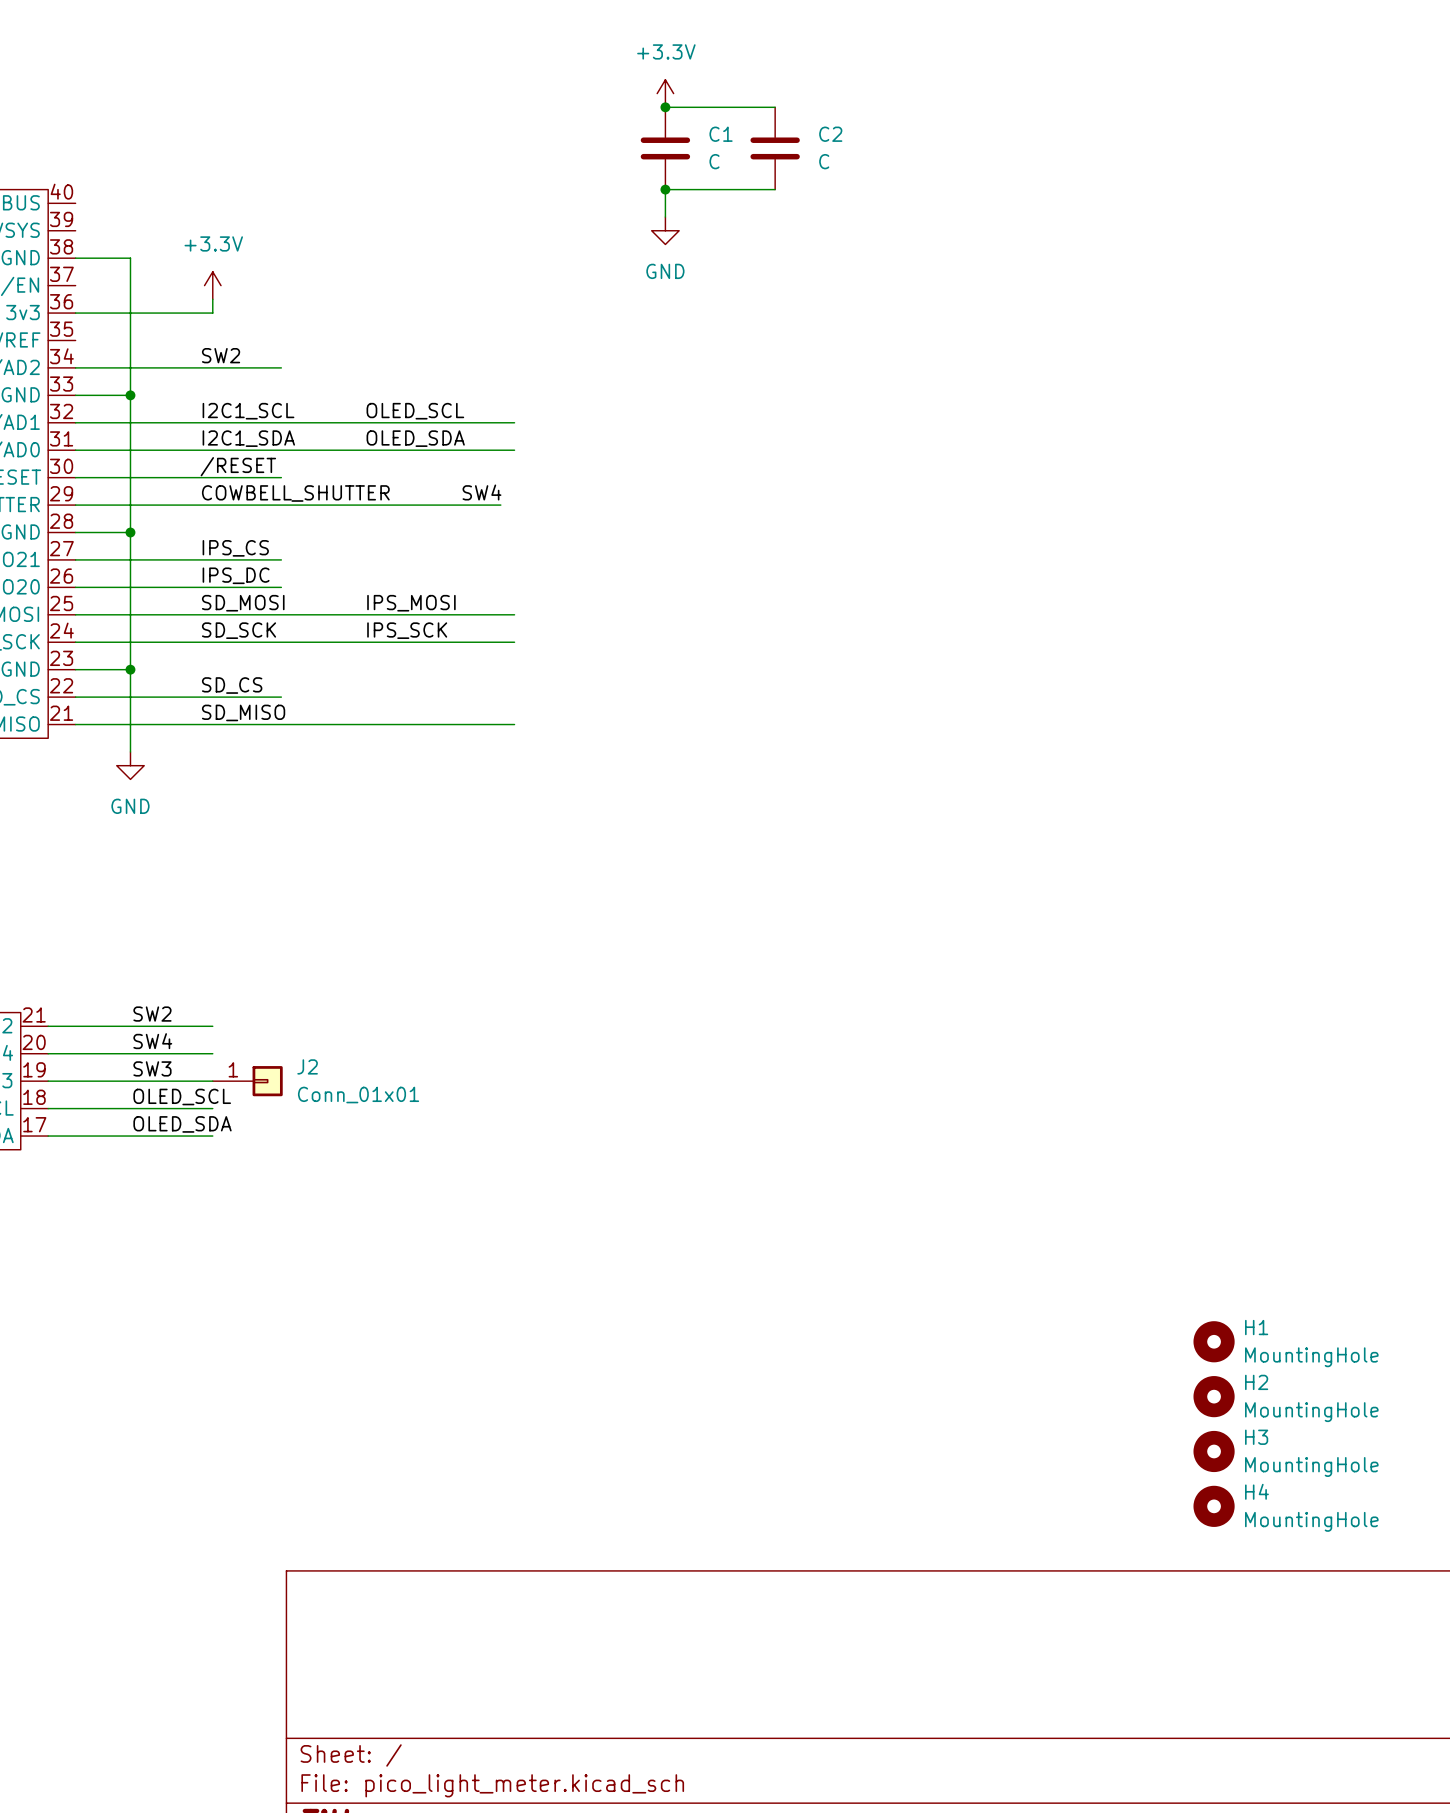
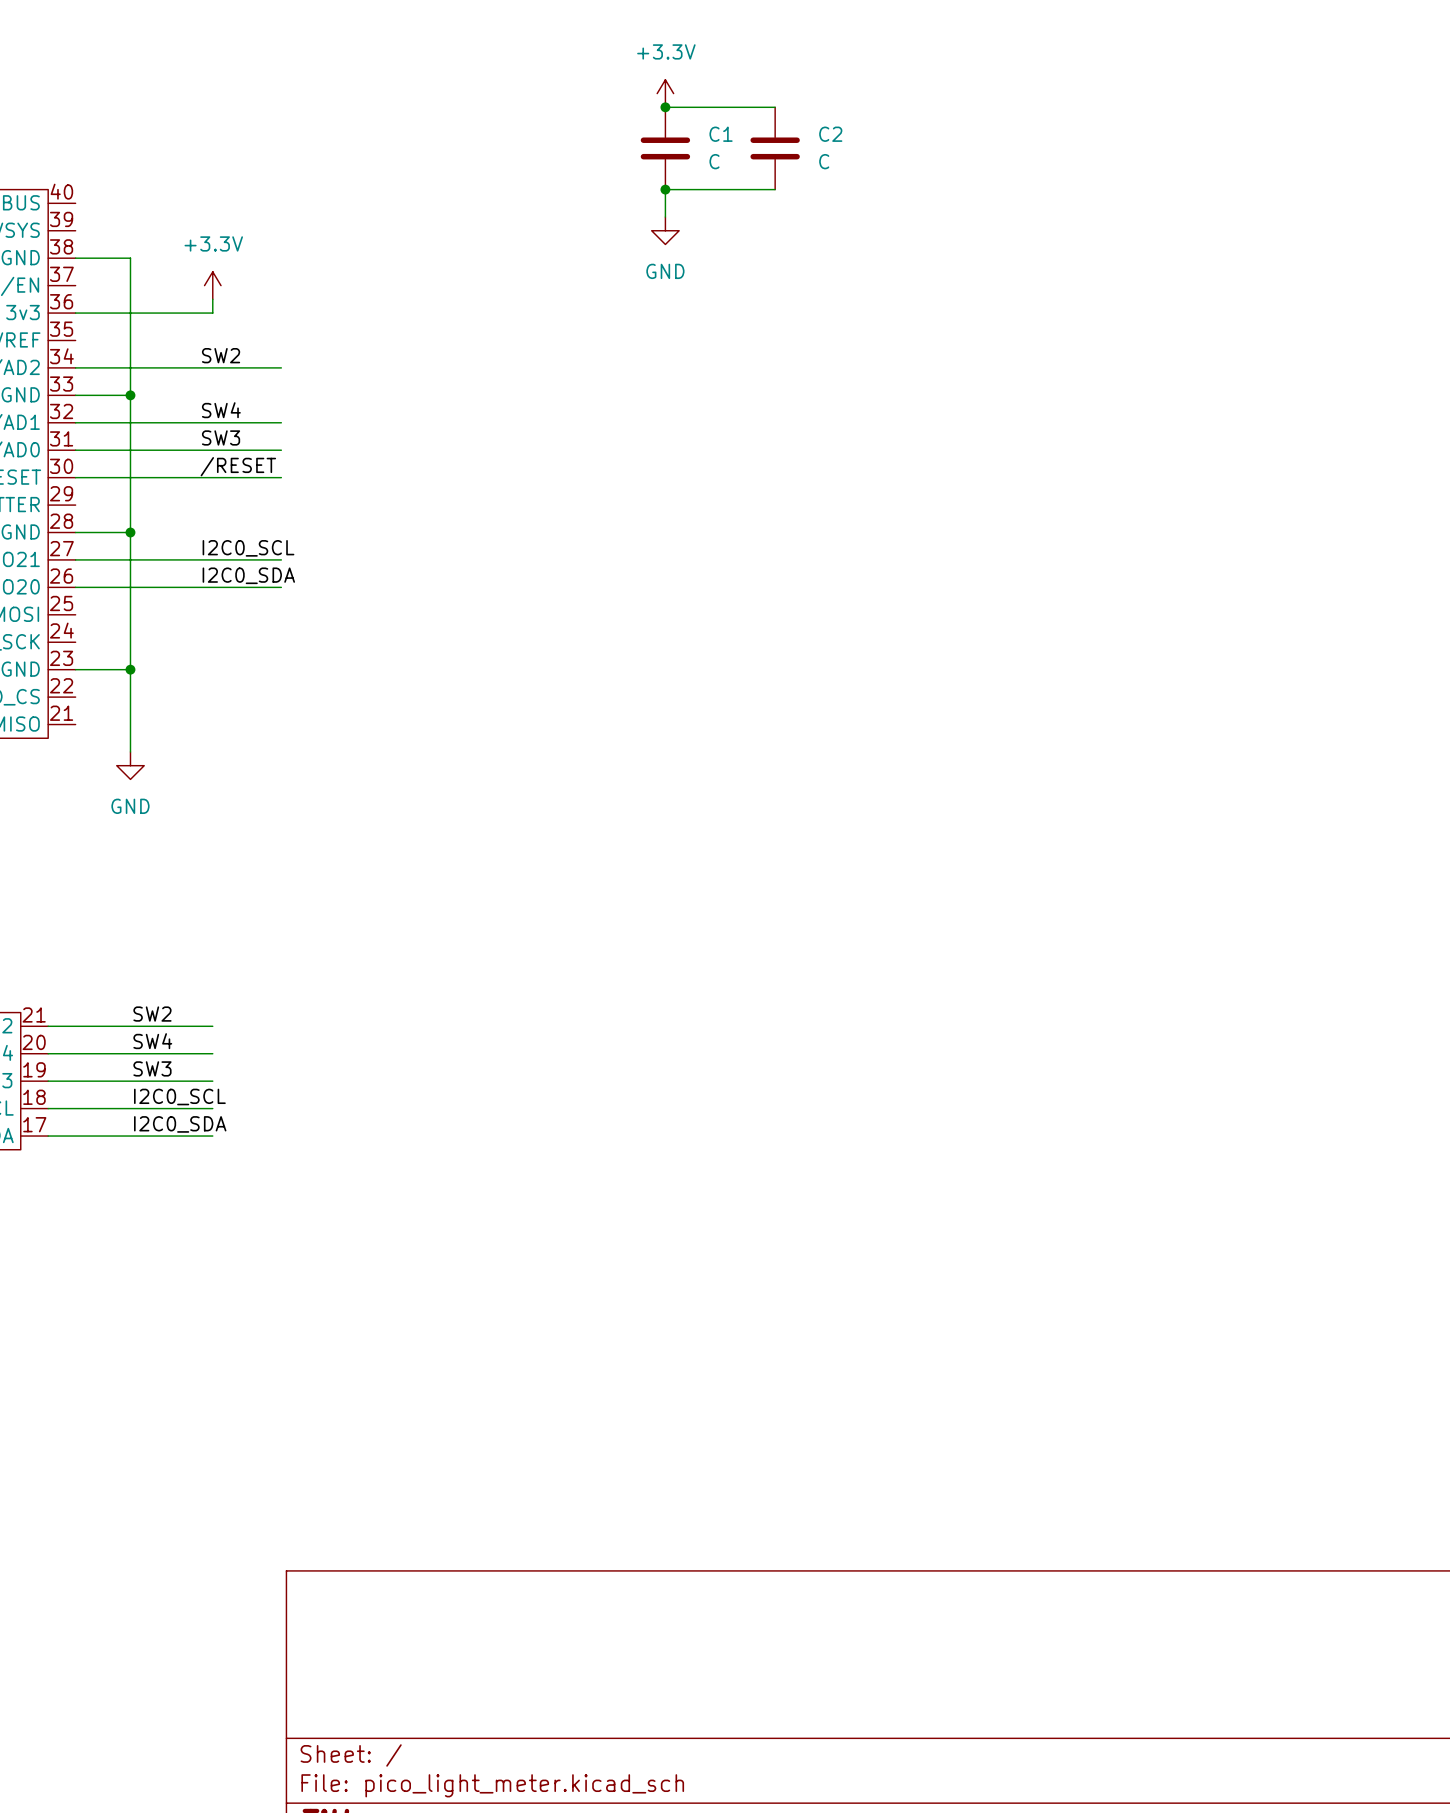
label: I2C1_SCL (248, 411) -> SW4 (221, 410)
label: OLED_SCL (415, 411) -> none
wire: (281, 422) (514, 422) -> none
label: I2C1_SDA (248, 438) -> SW3 (221, 437)
label: OLED_SDA (415, 438) -> none
wire: (281, 450) (514, 450) -> none
label: SW4 (481, 492) -> none
label: COWBELL_SHUTTER (295, 493) -> none
wire: (75, 505) (500, 505) -> none
label: IPS_CS (235, 548) -> I2C0_SCL (248, 548)
label: IPS_DC (236, 575) -> I2C0_SDA (248, 575)
label: SD_MOSI (243, 603) -> none
label: IPS_MOSI (411, 603) -> none
wire: (75, 614) (514, 614) -> none
label: SD_SCK (239, 630) -> none
label: IPS_SCK (407, 630) -> none
wire: (75, 642) (514, 642) -> none
label: SD_CS (232, 685) -> none
wire: (75, 697) (281, 697) -> none
label: SD_MISO (243, 712) -> none
wire: (75, 724) (514, 724) -> none
J2: Conn_01x01 (247, 1081) -> none
label: OLED_SCL (182, 1097) -> I2C0_SCL (179, 1097)
label: OLED_SDA (182, 1124) -> I2C0_SDA (180, 1124)
H1: MountingHole (1214, 1341) -> none
H2: MountingHole (1214, 1396) -> none
H3: MountingHole (1214, 1451) -> none
H4: MountingHole (1214, 1506) -> none

